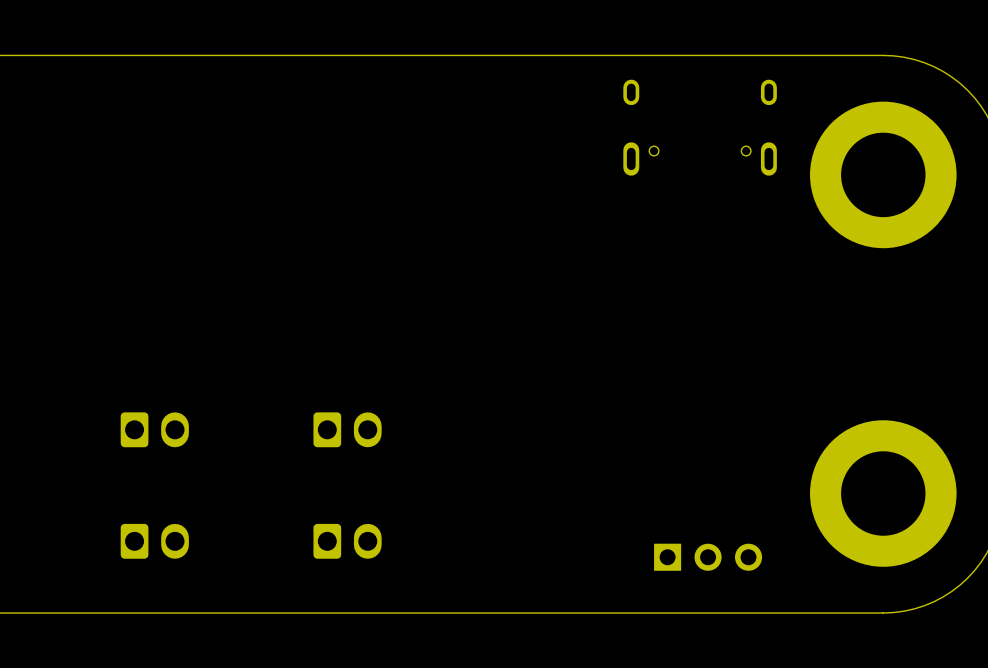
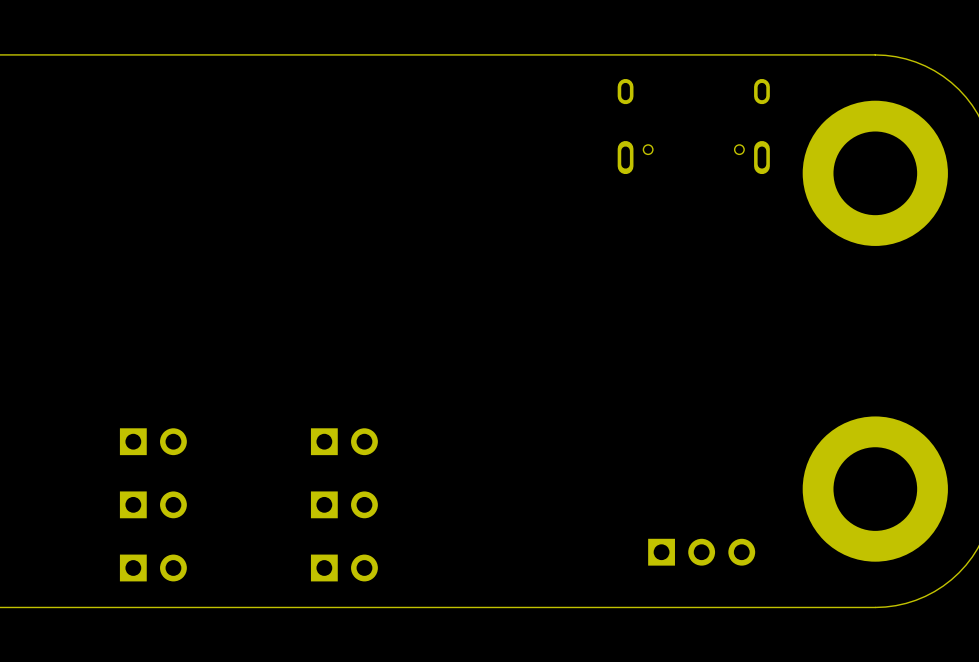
part: (154, 429) -> none
part: (347, 429) -> none
part: none -> (153, 441)
part: none -> (344, 441)
part: none -> (153, 504)
part: none -> (344, 504)
part: (154, 541) -> none
part: (347, 541) -> none
part: none -> (153, 568)
part: none -> (344, 568)

